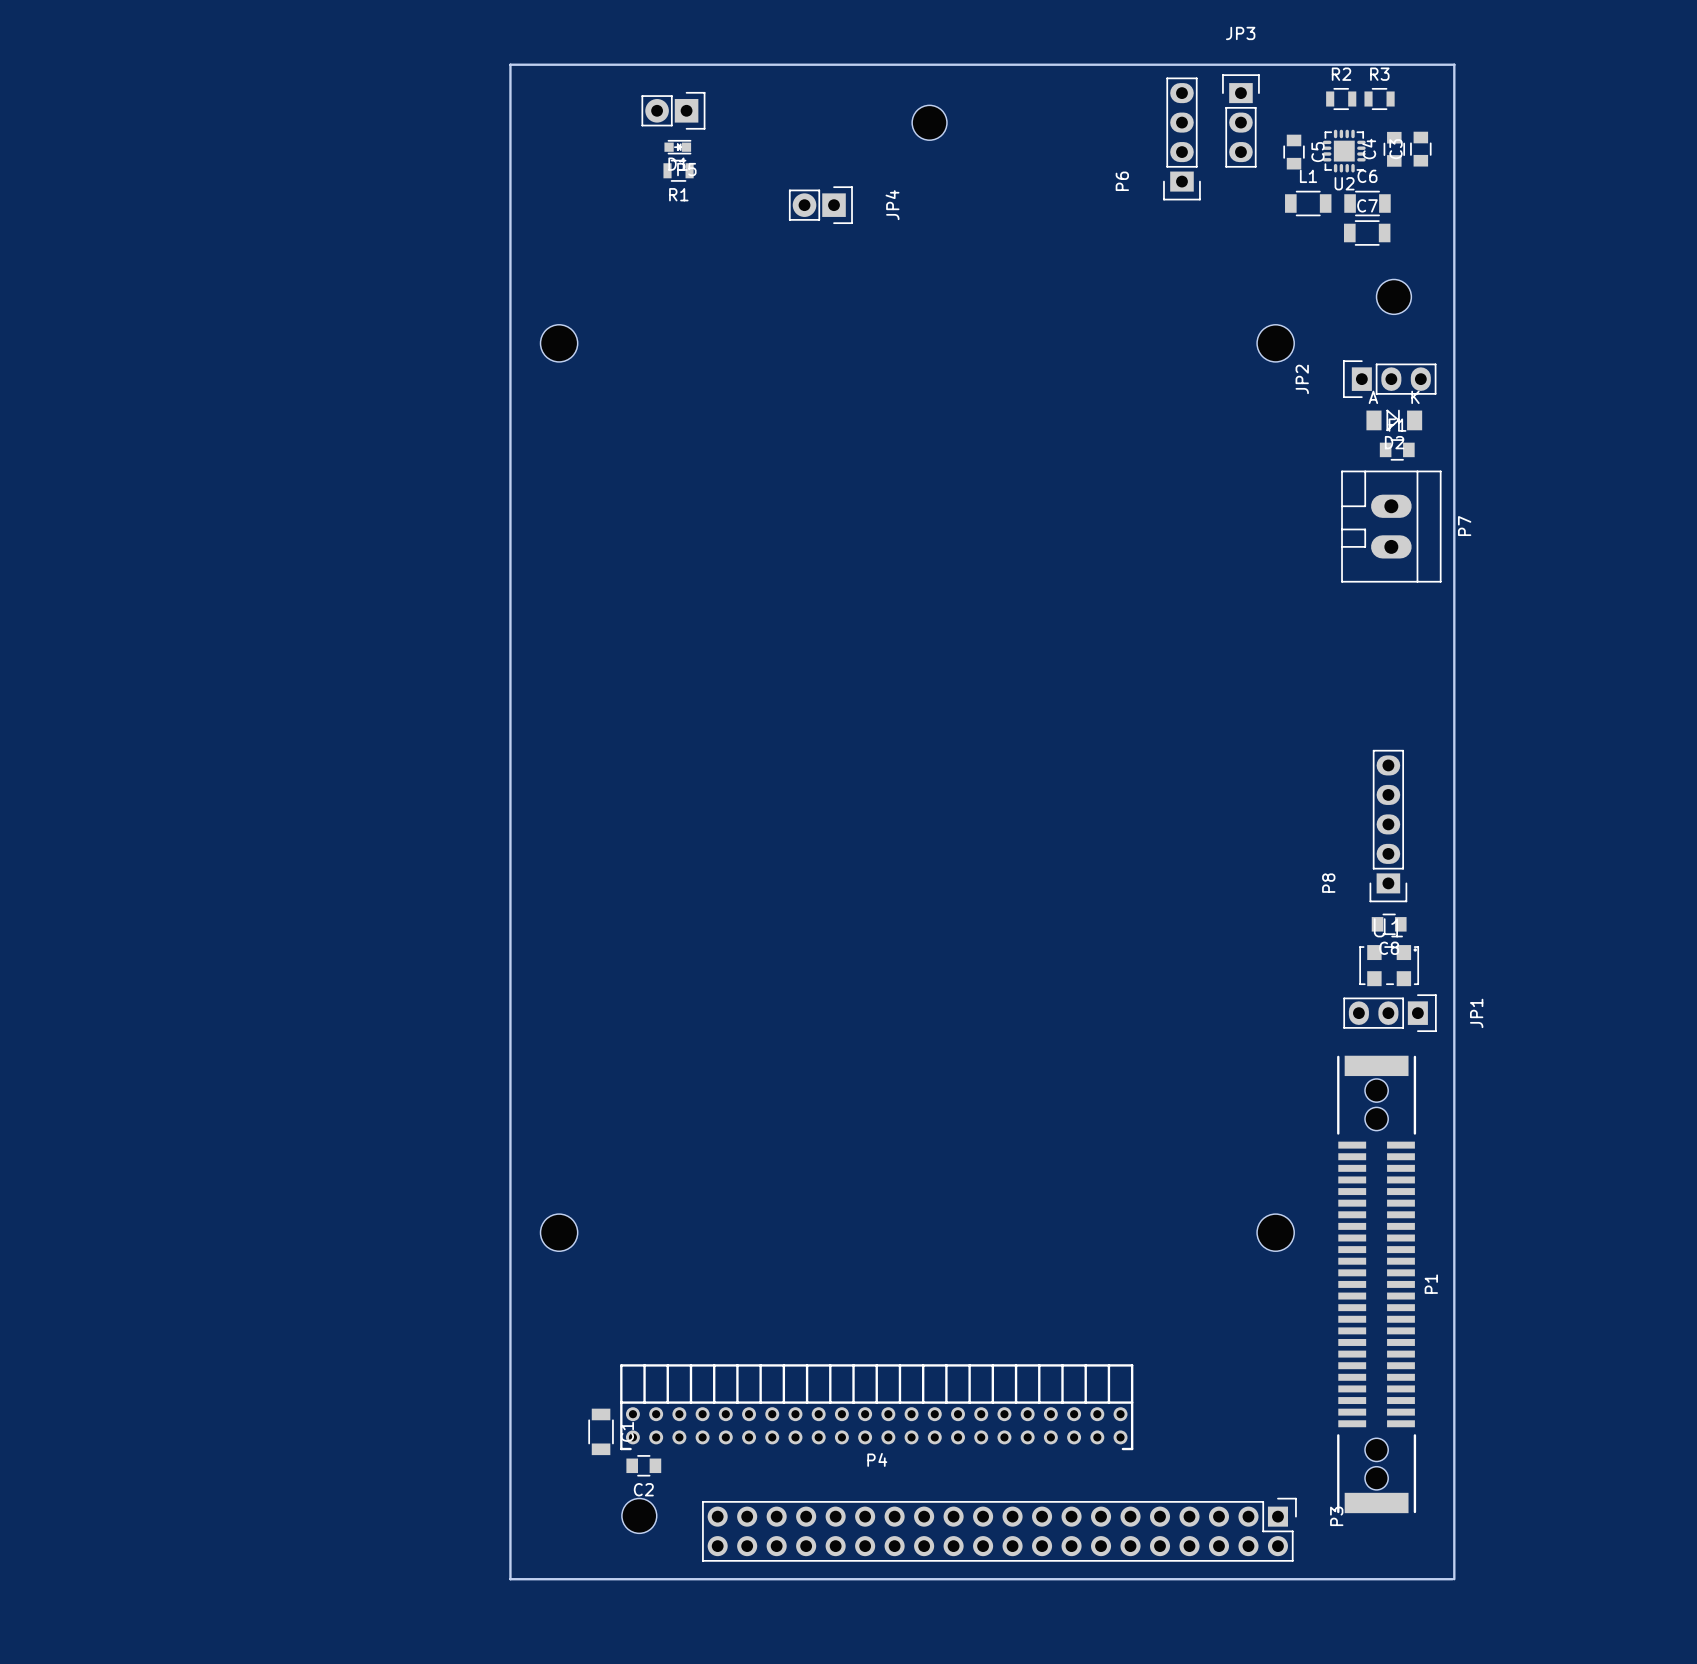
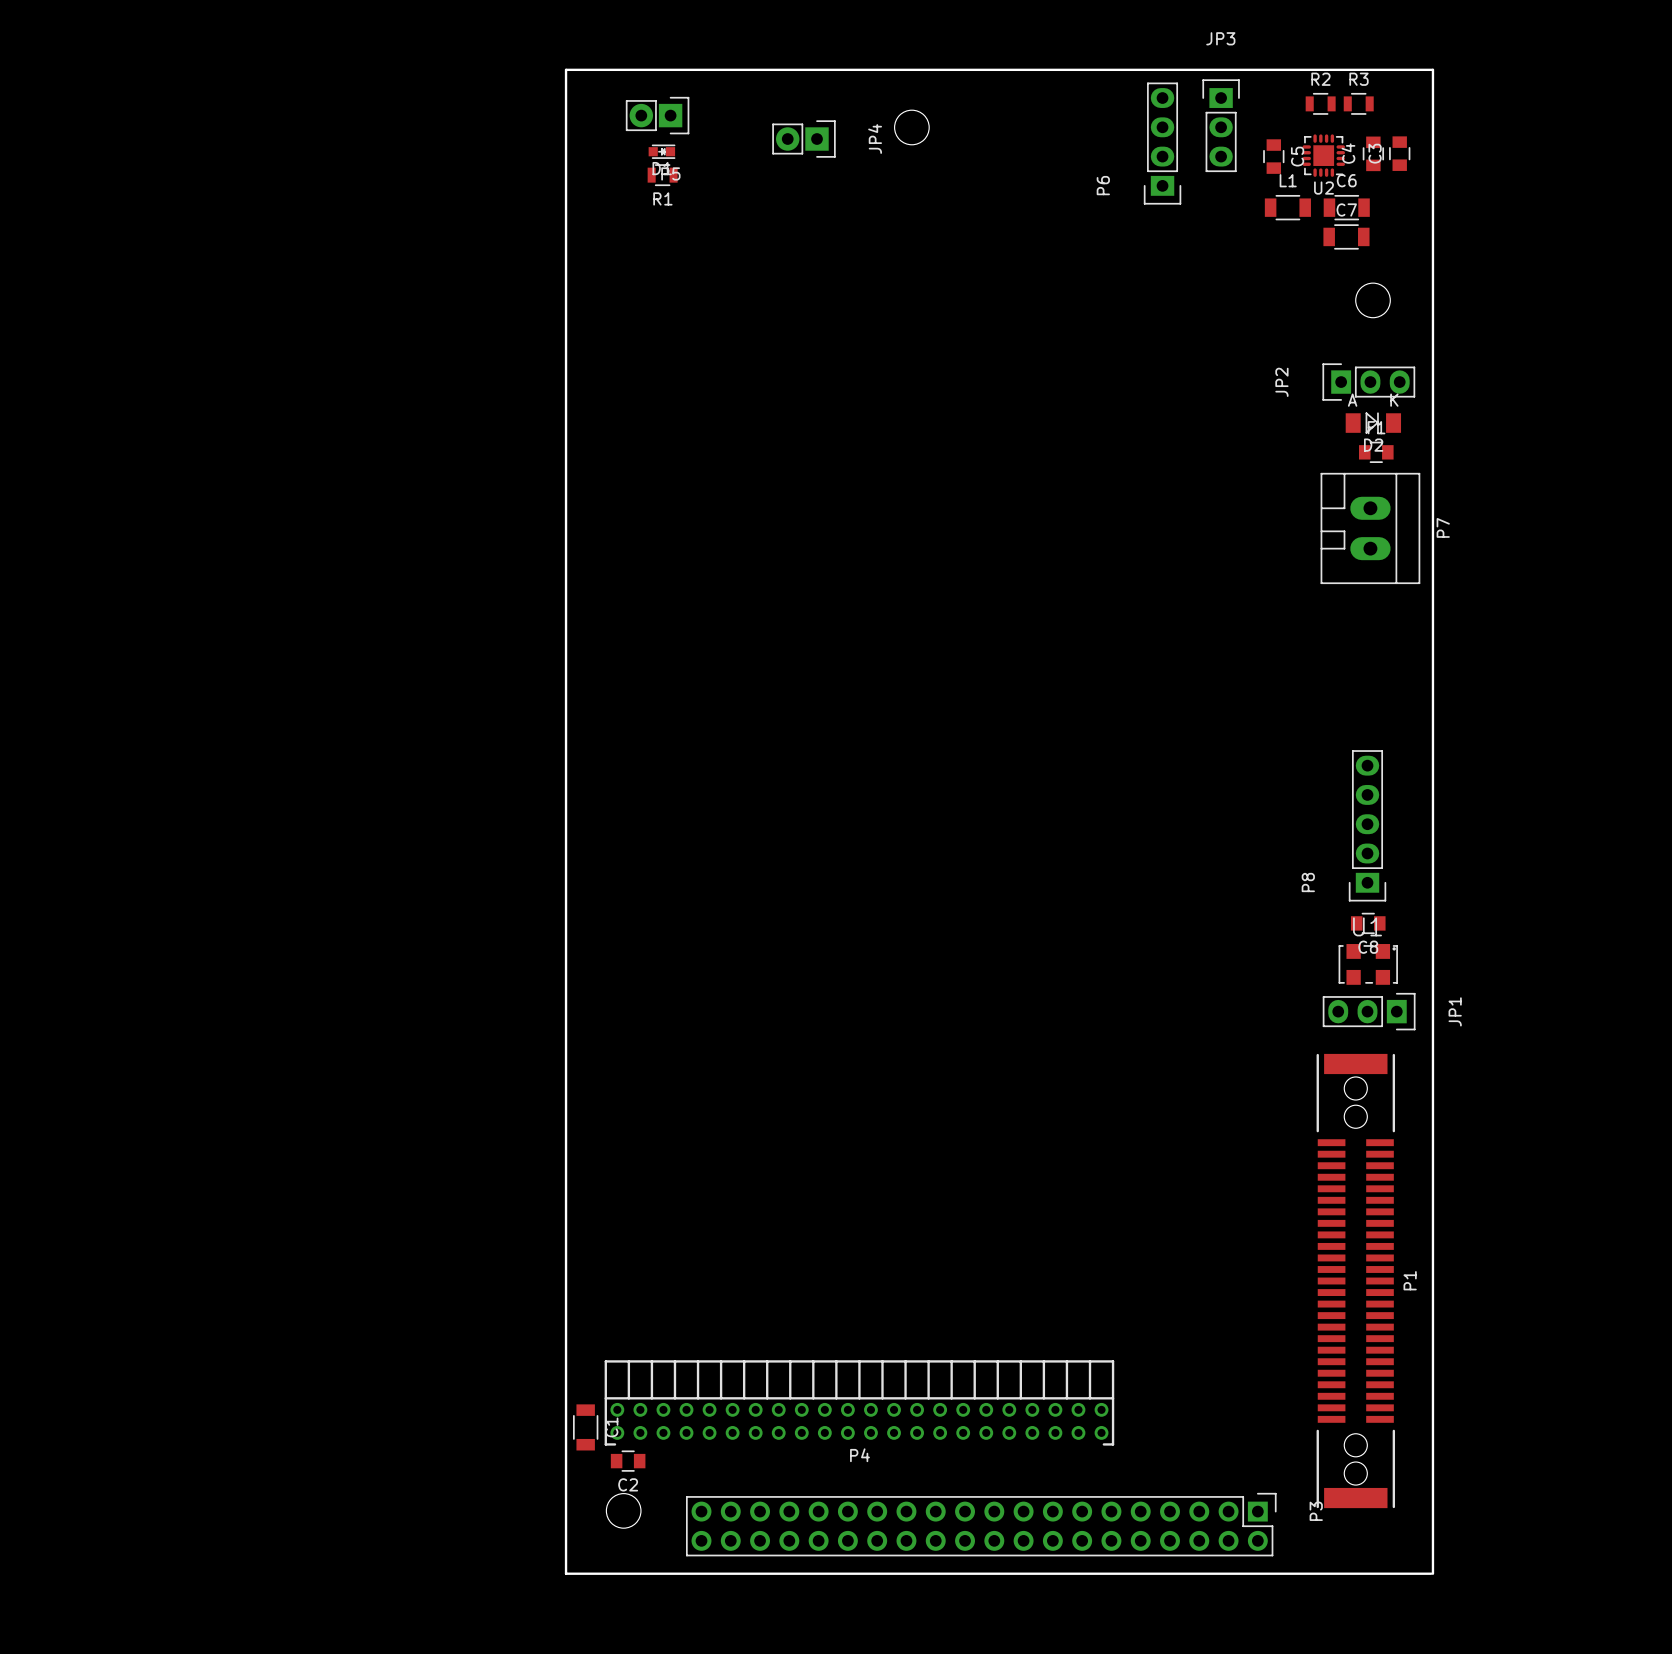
board edge: (581, 64) (510, 64) (510, 1579) (581, 1579) -> (566, 69) (566, 1573)
JP4 position: (820, 205) -> (803, 139)
part: (559, 343) -> none
part: (1275, 343) -> none
part: (559, 1232) -> none
part: (1275, 1232) -> none

